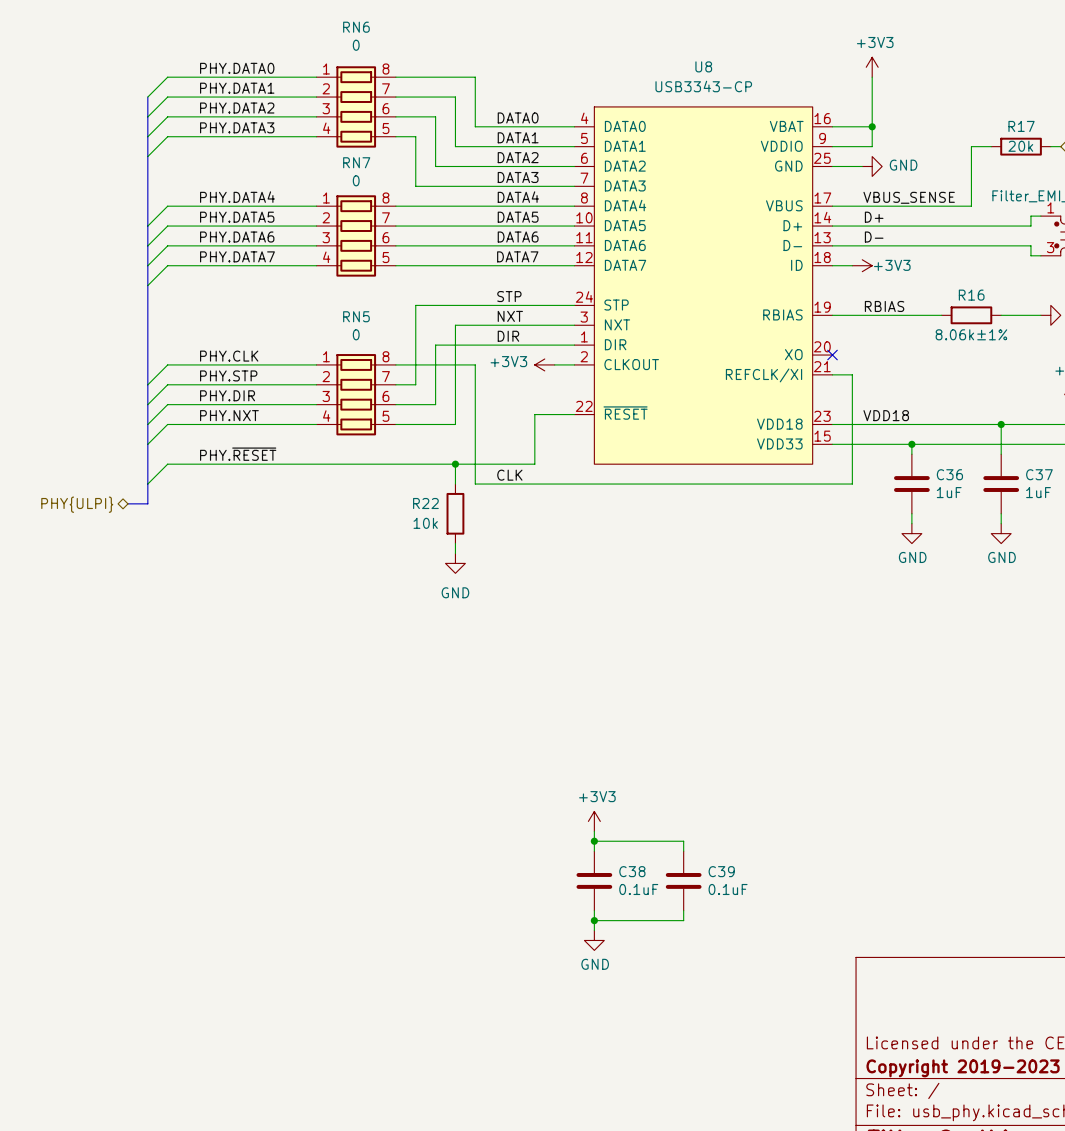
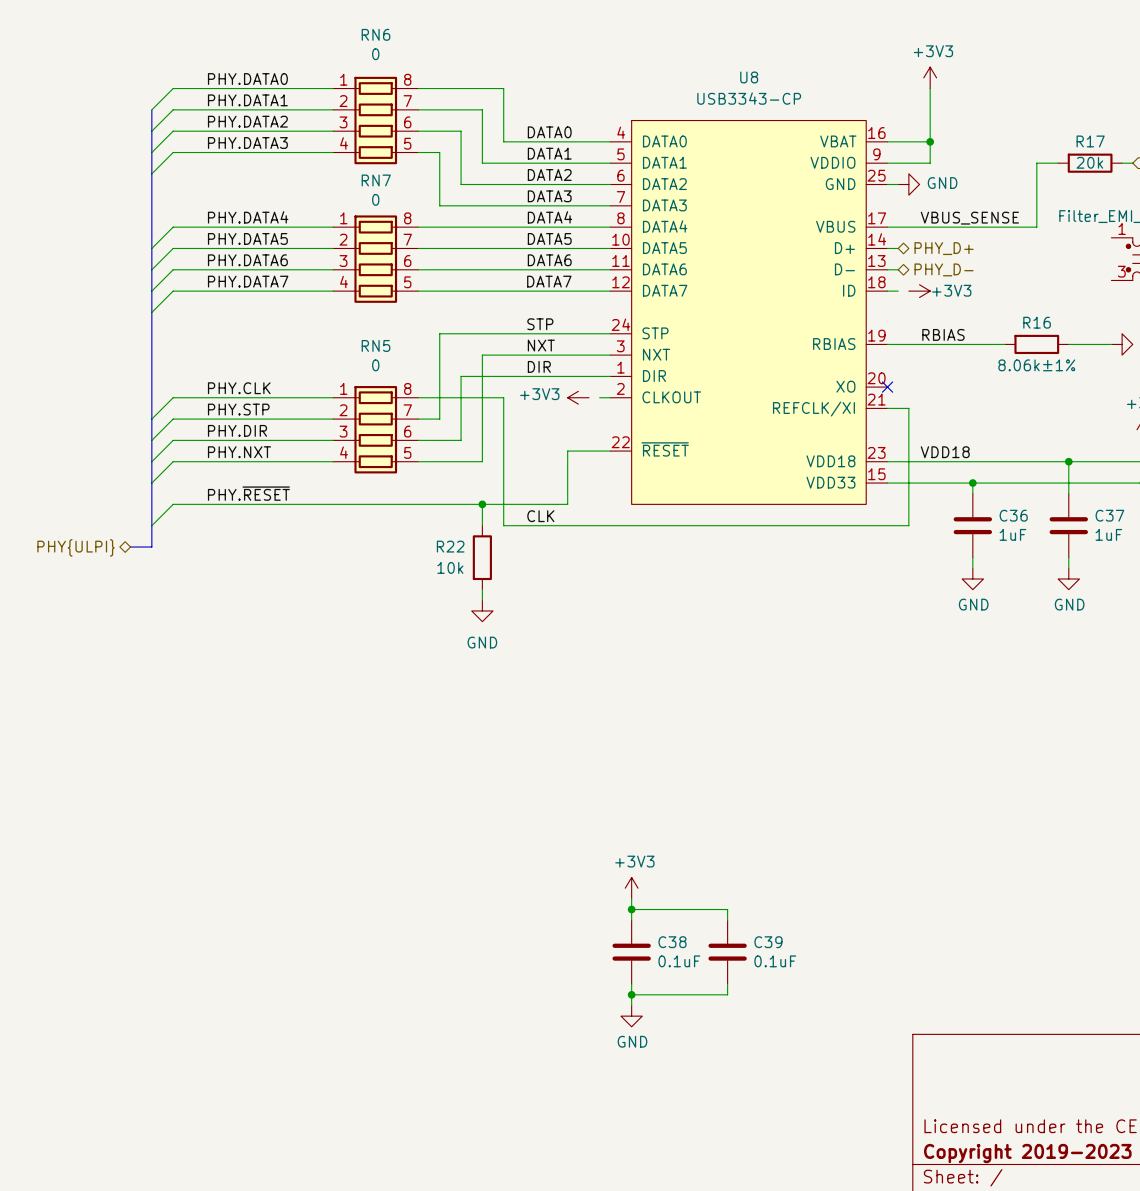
power symbol position: GND (872, 166) -> GND (908, 184)
wire: (1040, 216) (1030, 216) (1030, 226) (842, 226) -> none
label: D+ (874, 217) -> none
hierarchical label: none -> PHY_D+ (944, 248)
label: D- (874, 237) -> none
wire: (842, 245) (1030, 245) (1030, 255) (1040, 255) -> none
hierarchical label: none -> PHY_D- (944, 269)
wire: (842, 265) (852, 265) -> none
wire: (554, 364) (564, 364) -> none

